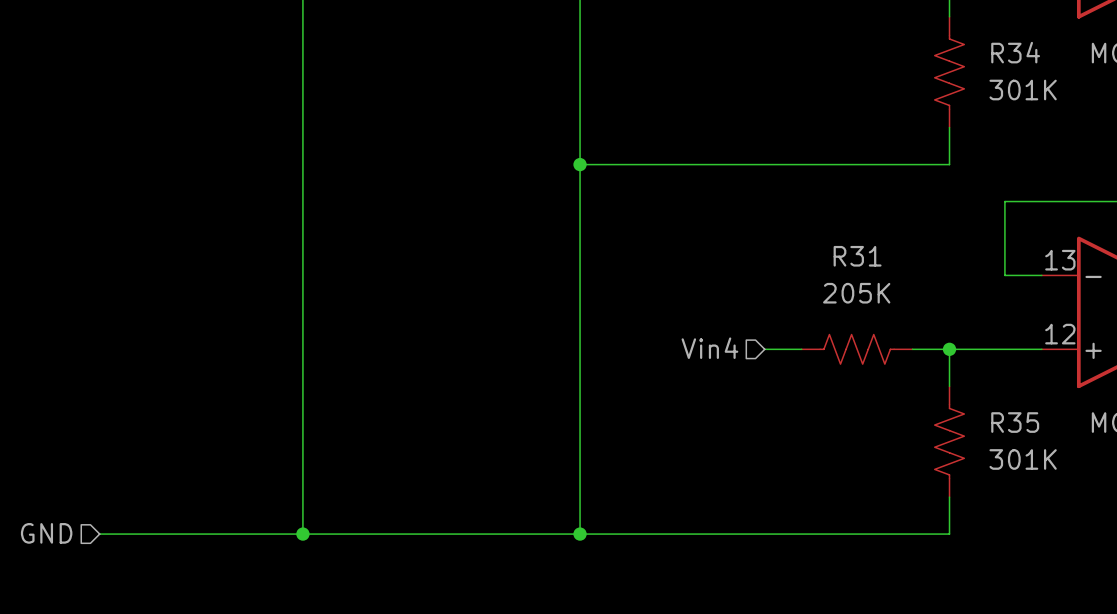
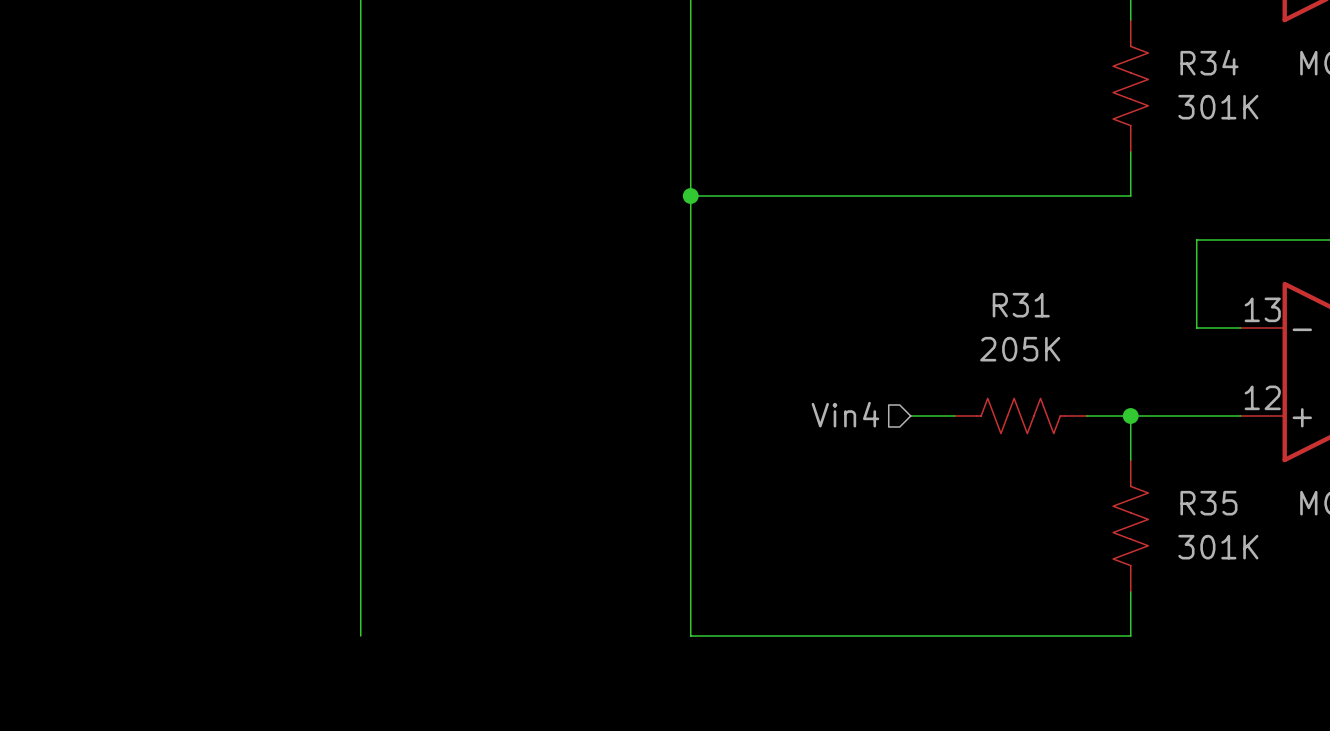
hierarchical label: GND (46, 533) -> none
wire: (99, 534) (580, 534) -> none
junction: (302, 534) -> none
junction: (580, 534) -> none

